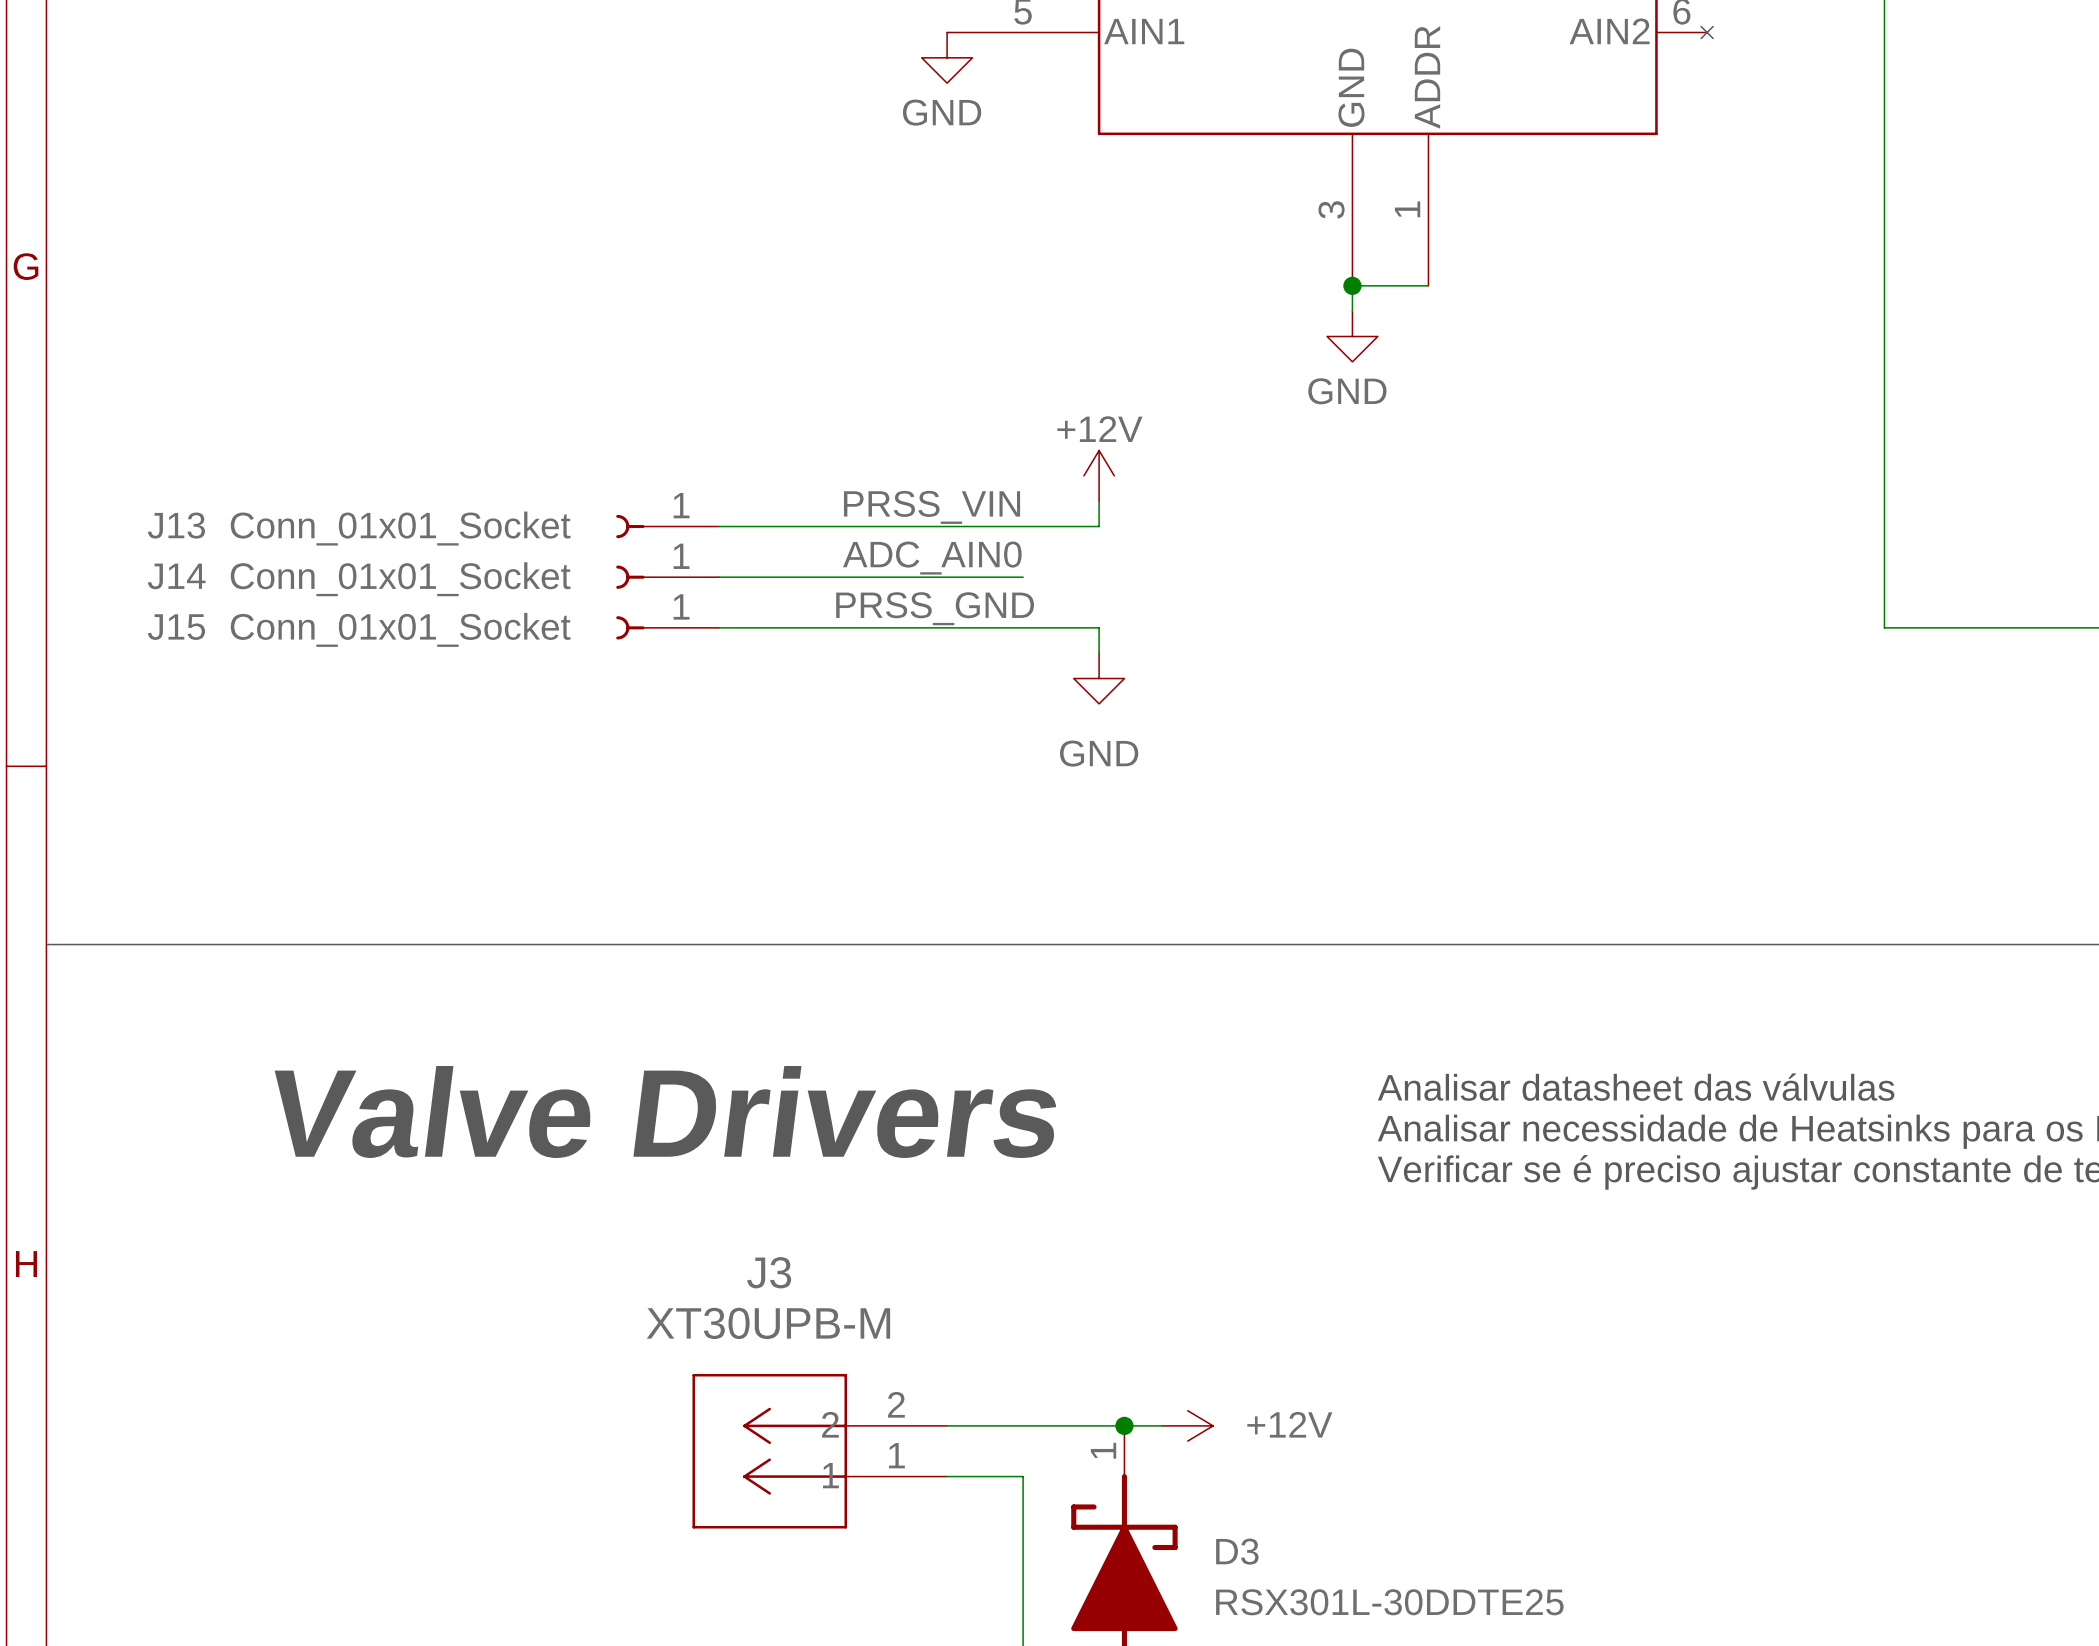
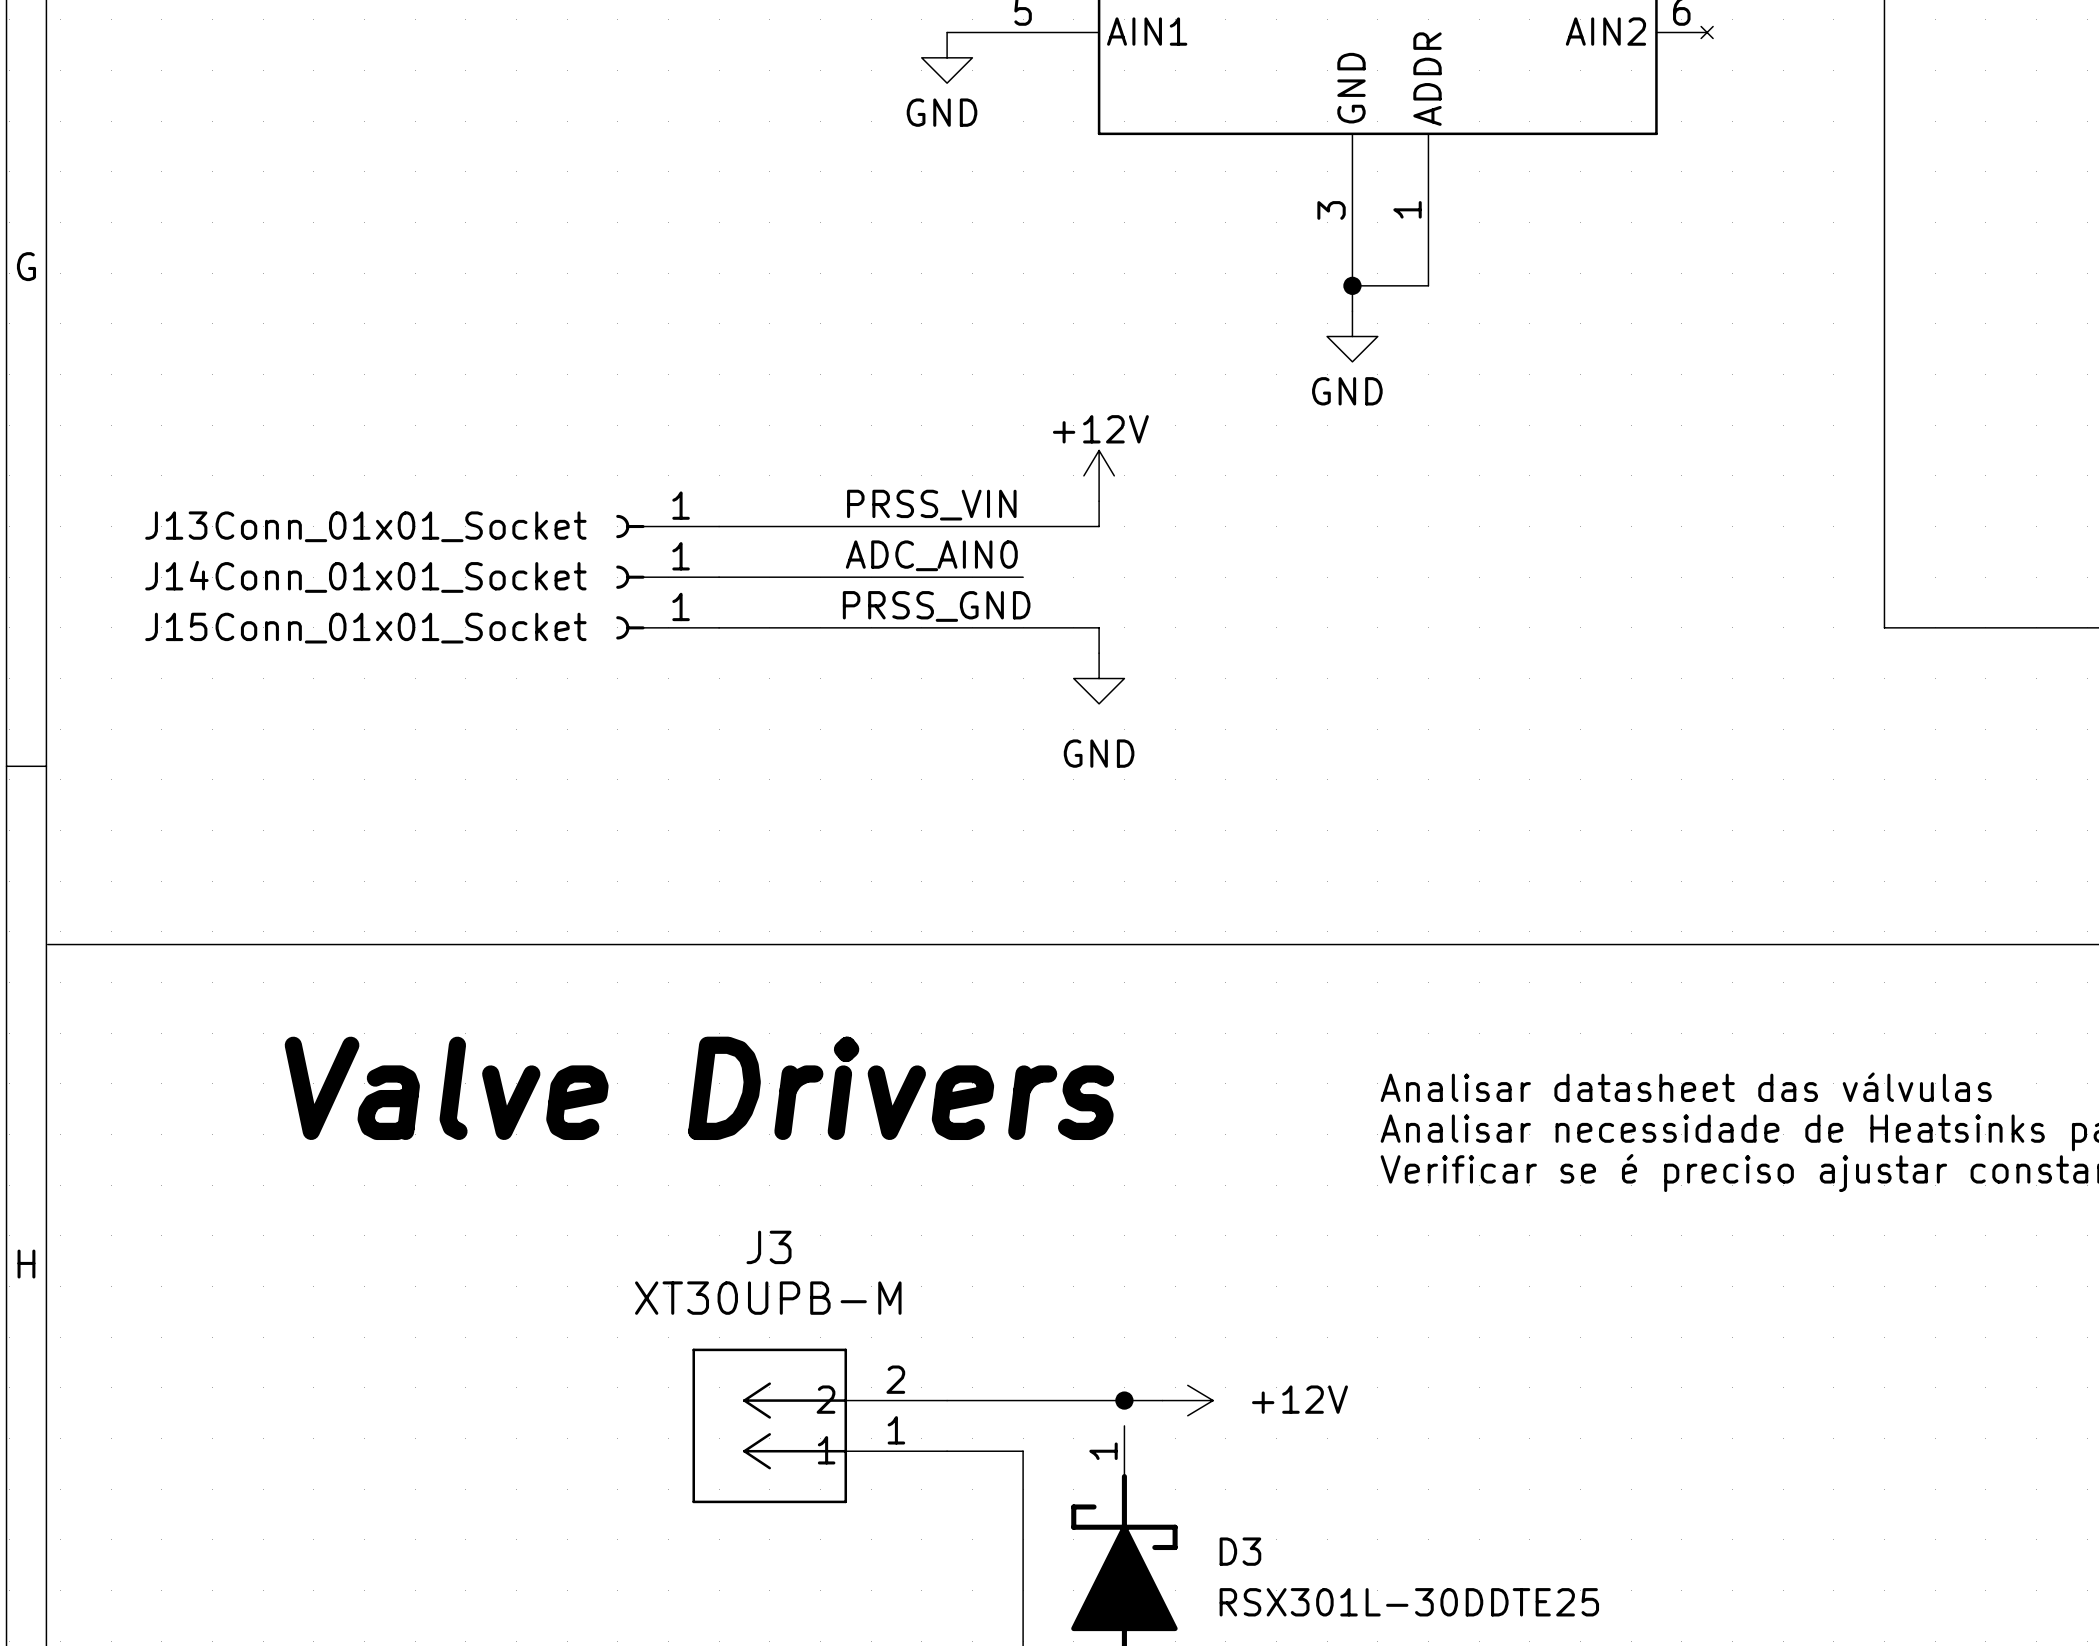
text position: Valve Drivers (665, 1111) -> Valve Drivers (699, 1088)
wire: (947, 1425) (1162, 1425) -> (947, 1400) (1162, 1400)
junction position: (1124, 1425) -> (1124, 1400)
power symbol position: +12V (1187, 1425) -> +12V (1187, 1400)
J3 position: (819, 1451) -> (819, 1425)
wire: (947, 1476) (1023, 1476) -> (947, 1451) (1023, 1451) (1023, 1476)

